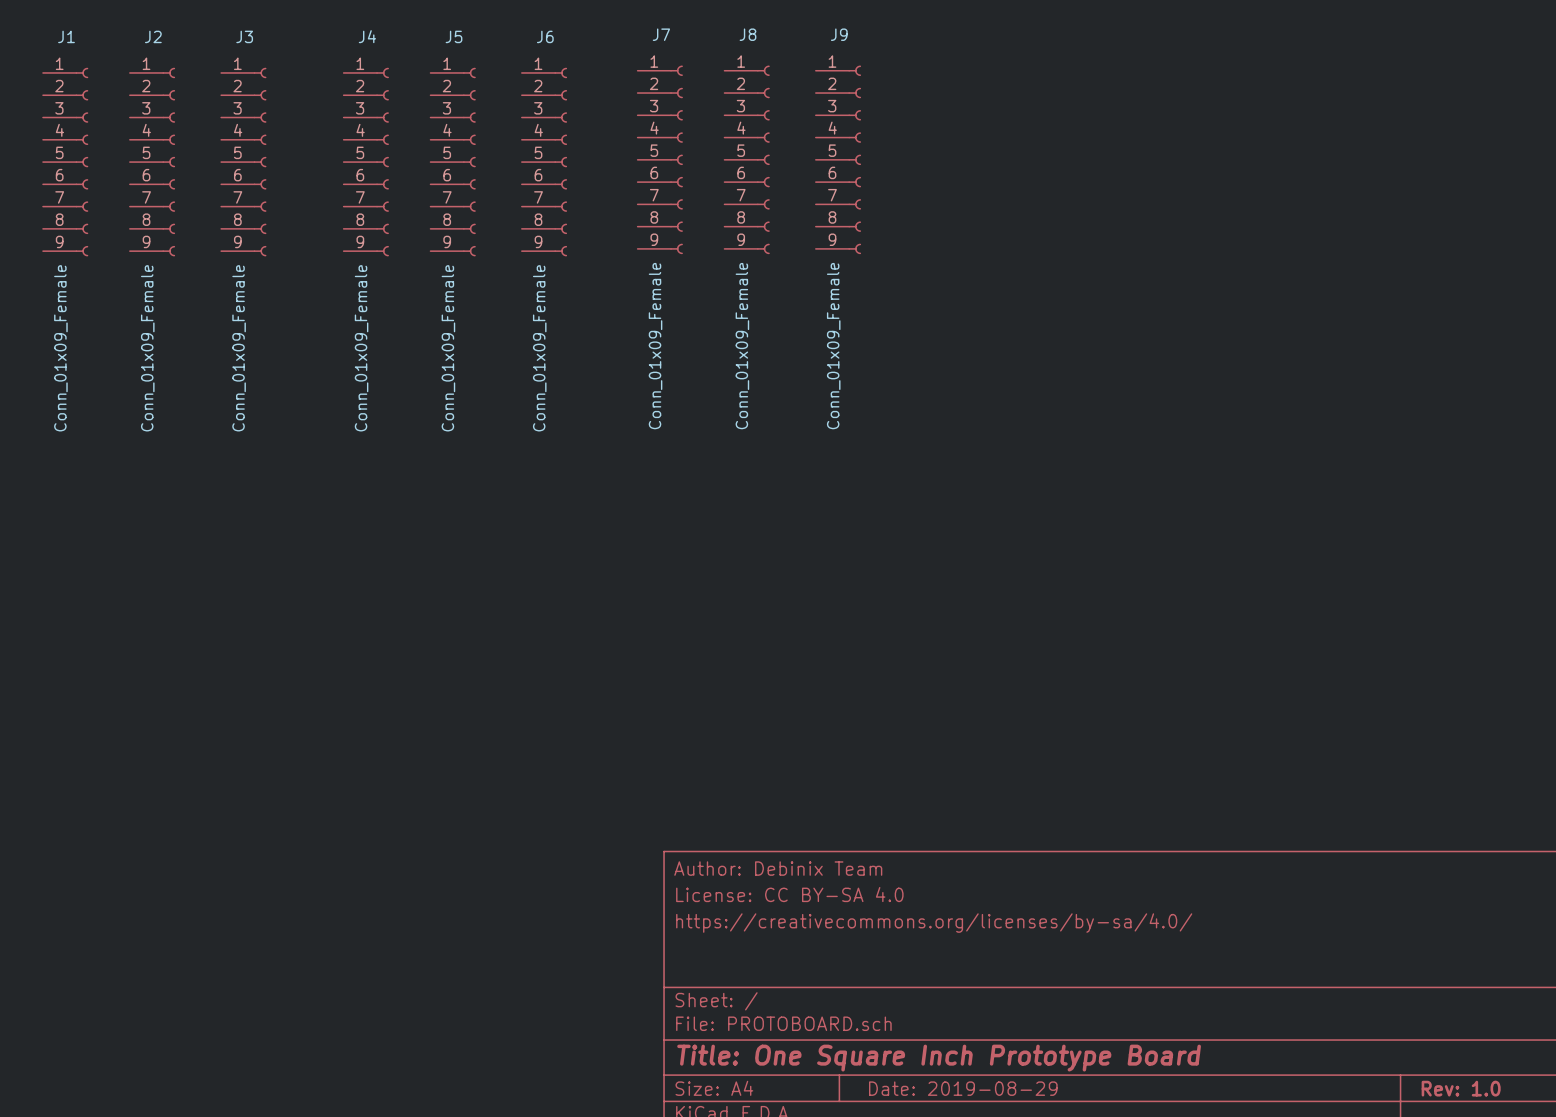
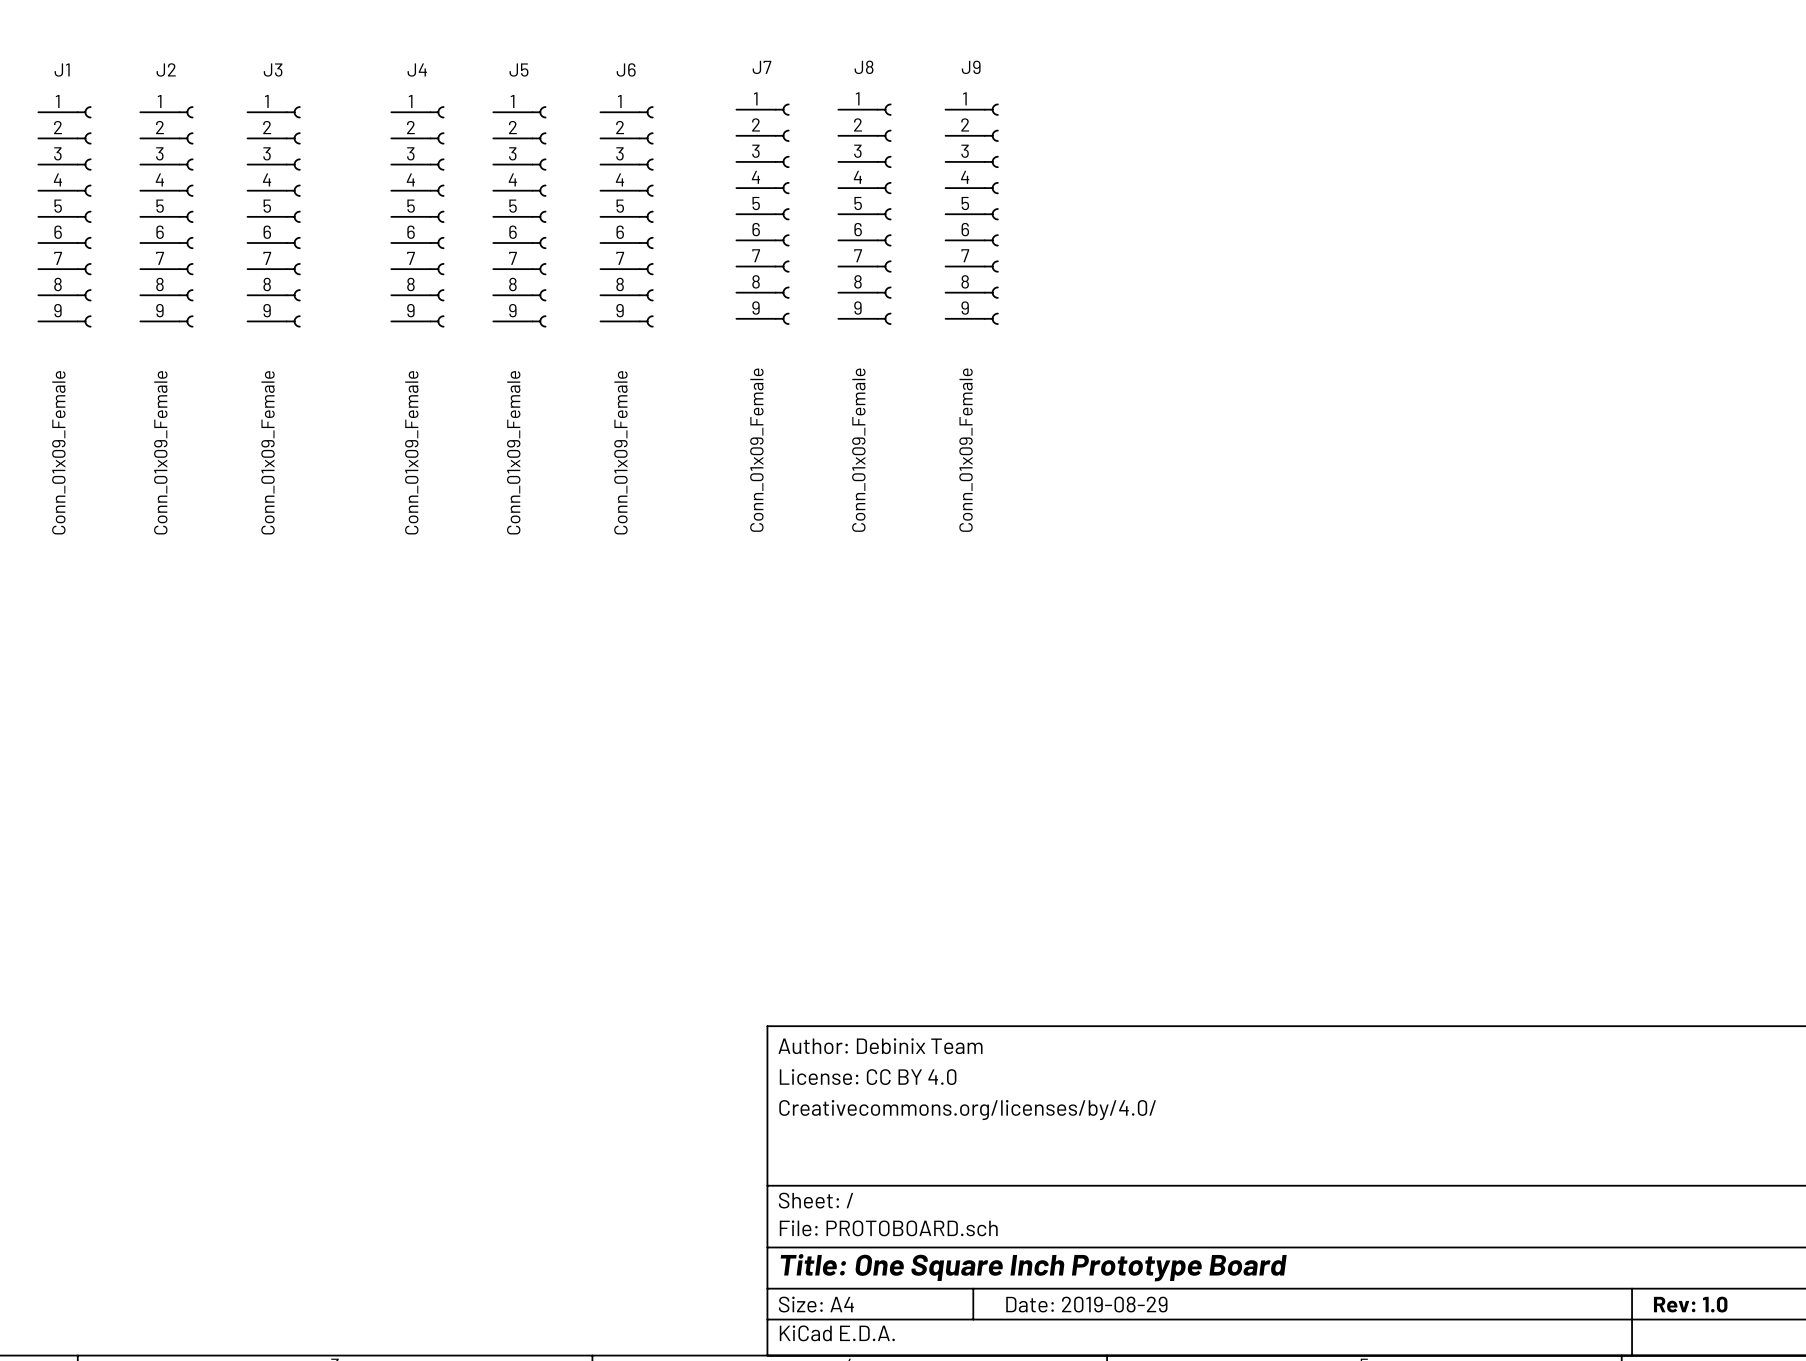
title block: License: CC BY-SA 4.0 (789, 894) -> License: CC BY 4.0 (868, 1077)
title block: https://creativecommons.org/licenses/by-sa/4.0/ (934, 923) -> Creativecommons.org/licenses/by/4.0/ (967, 1110)

